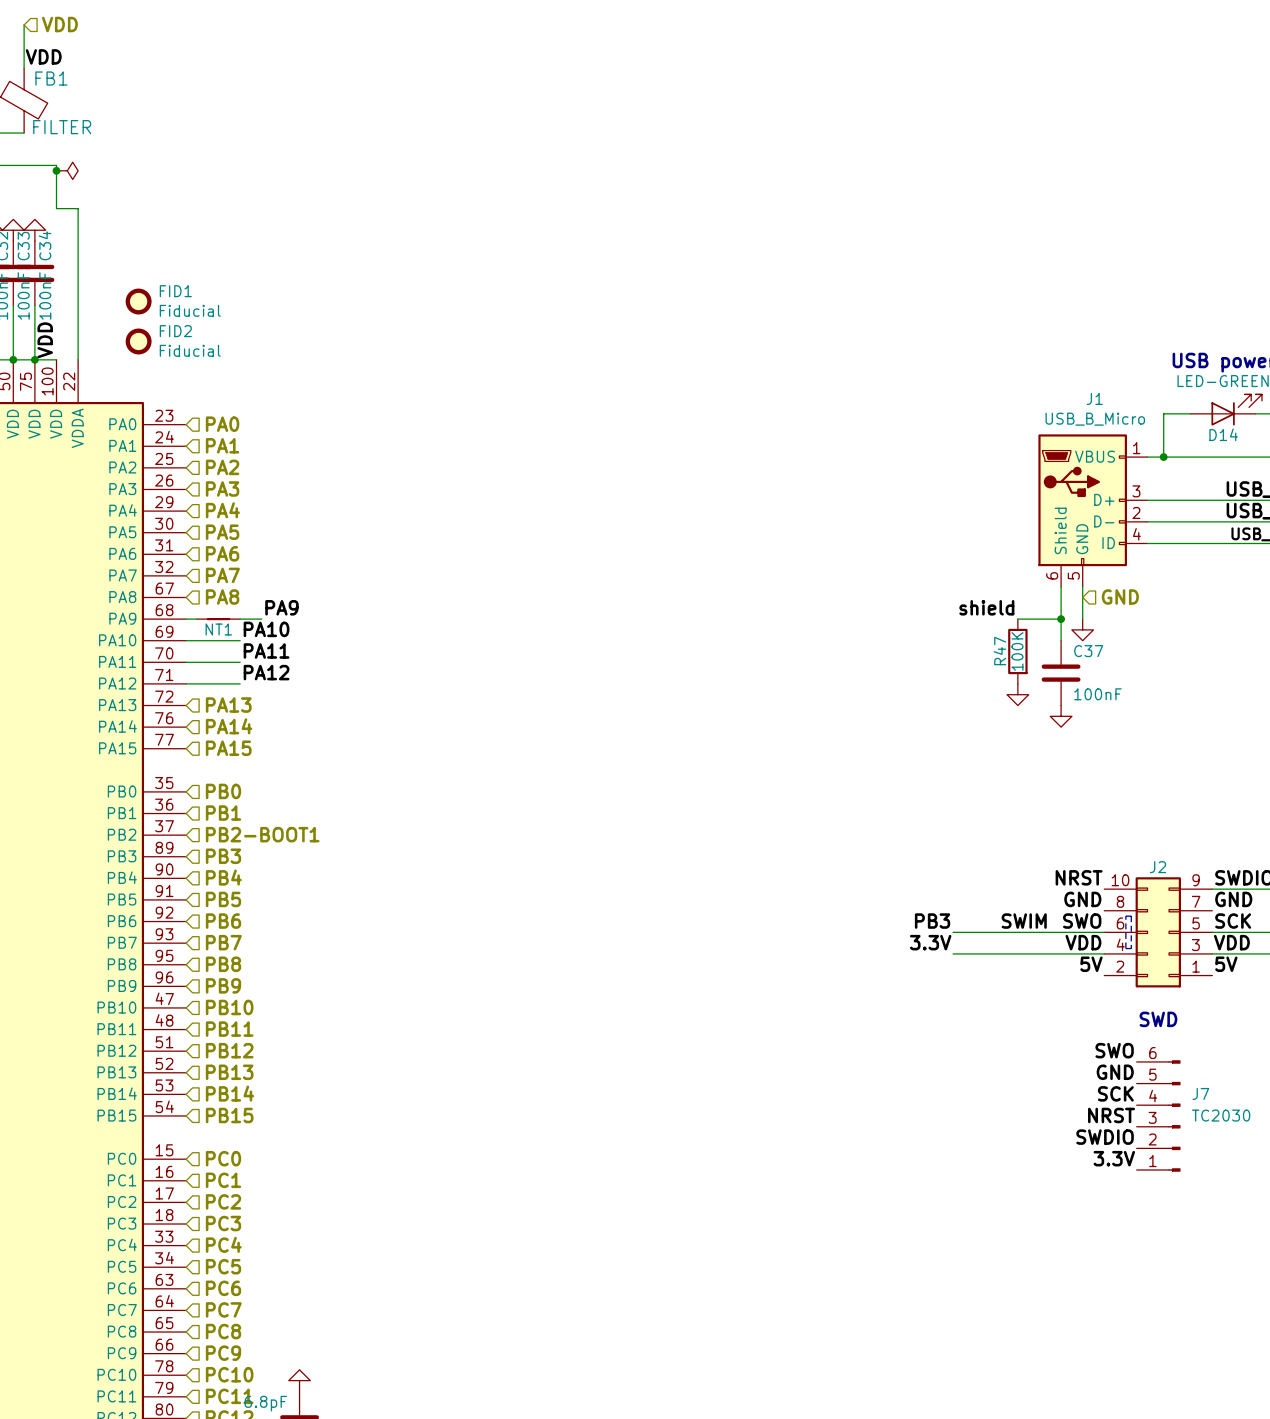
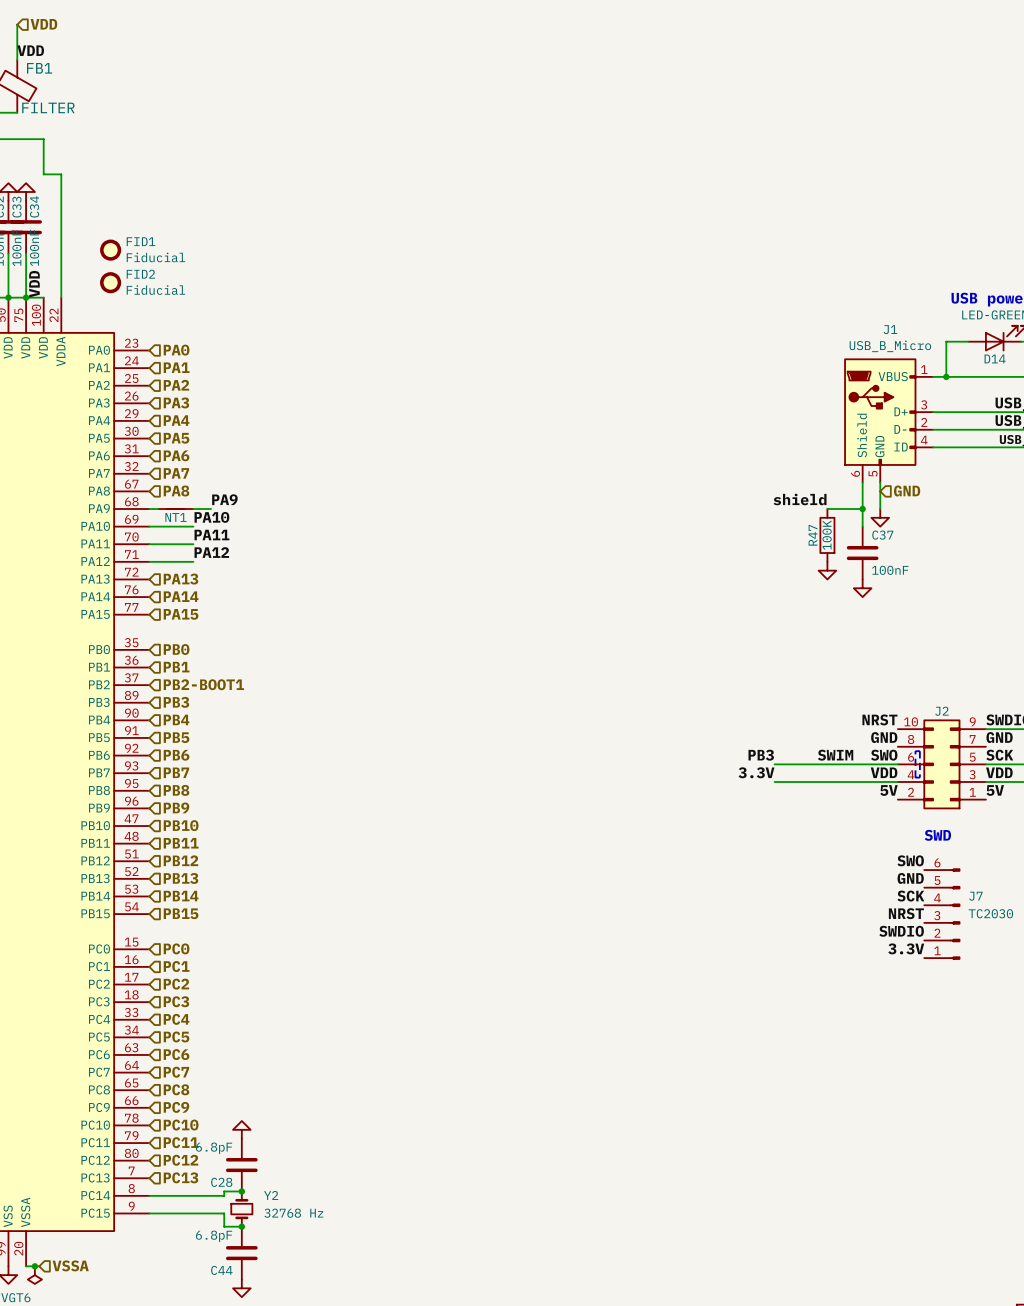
junction: (56, 170) -> none
power symbol: (67, 170) -> none

